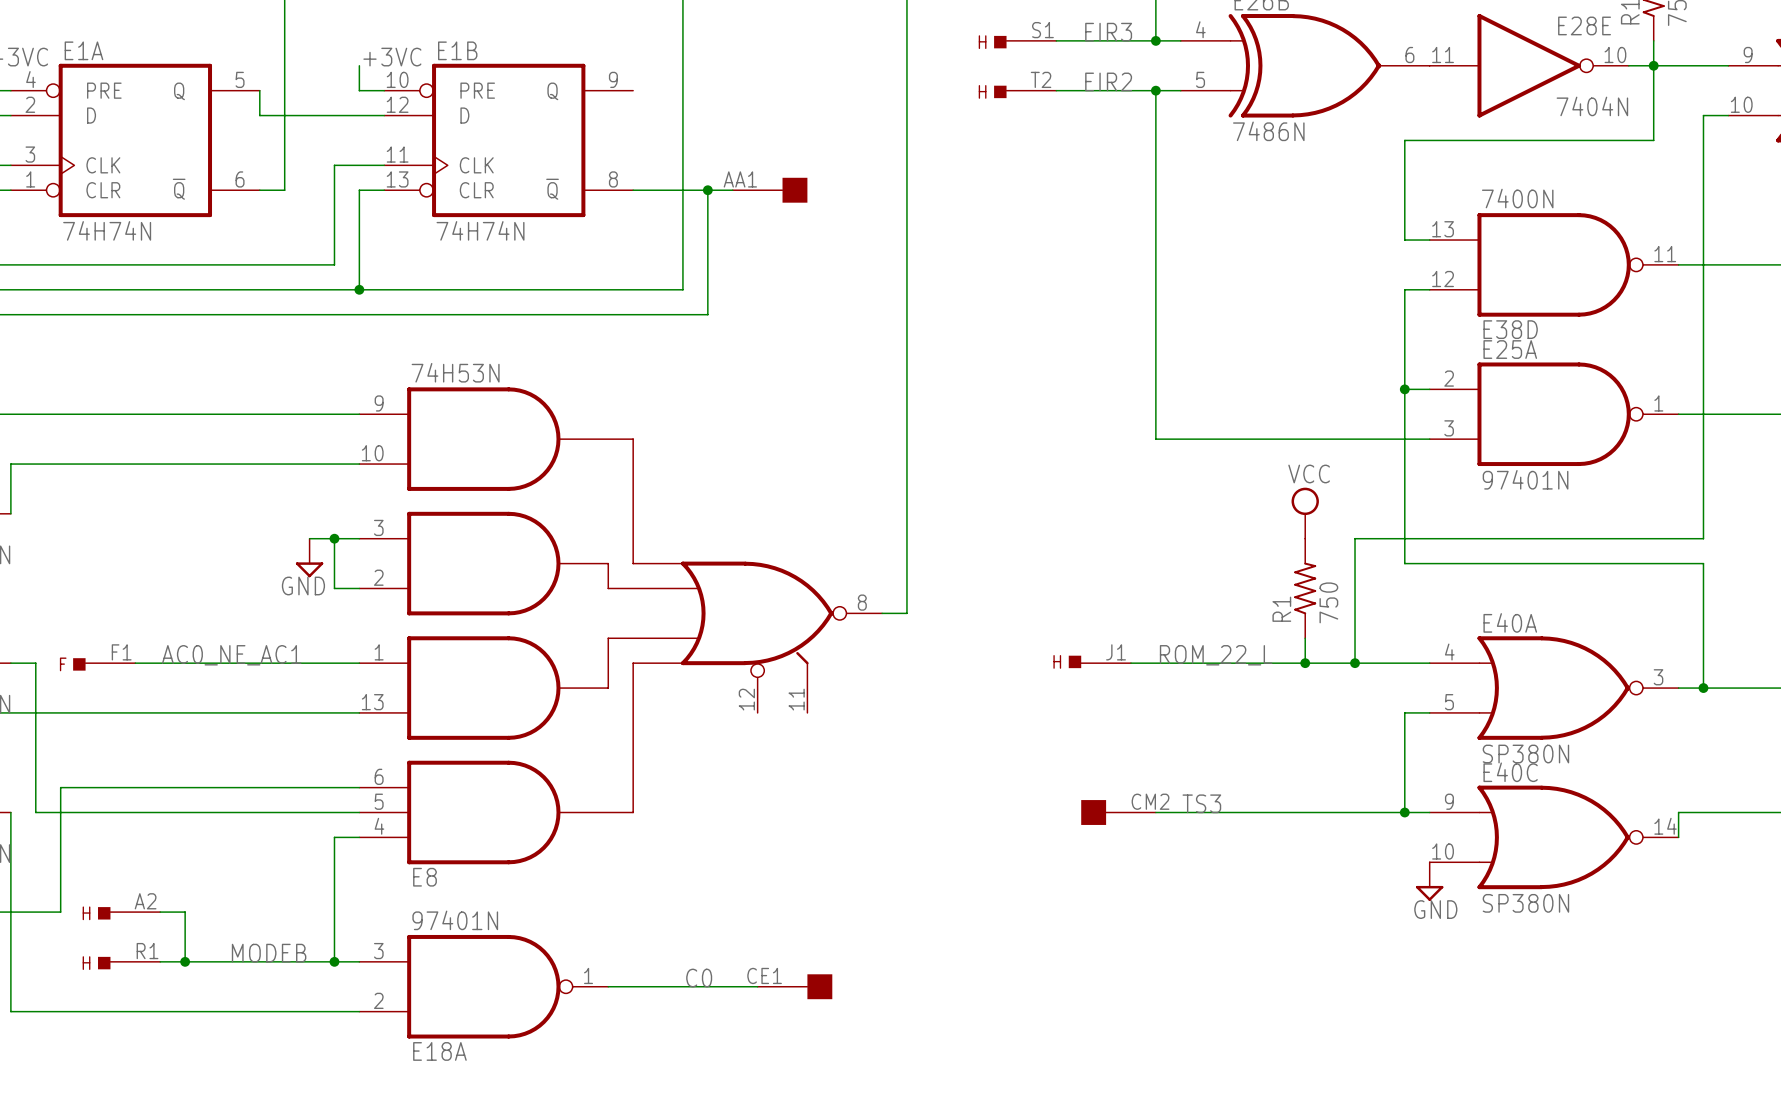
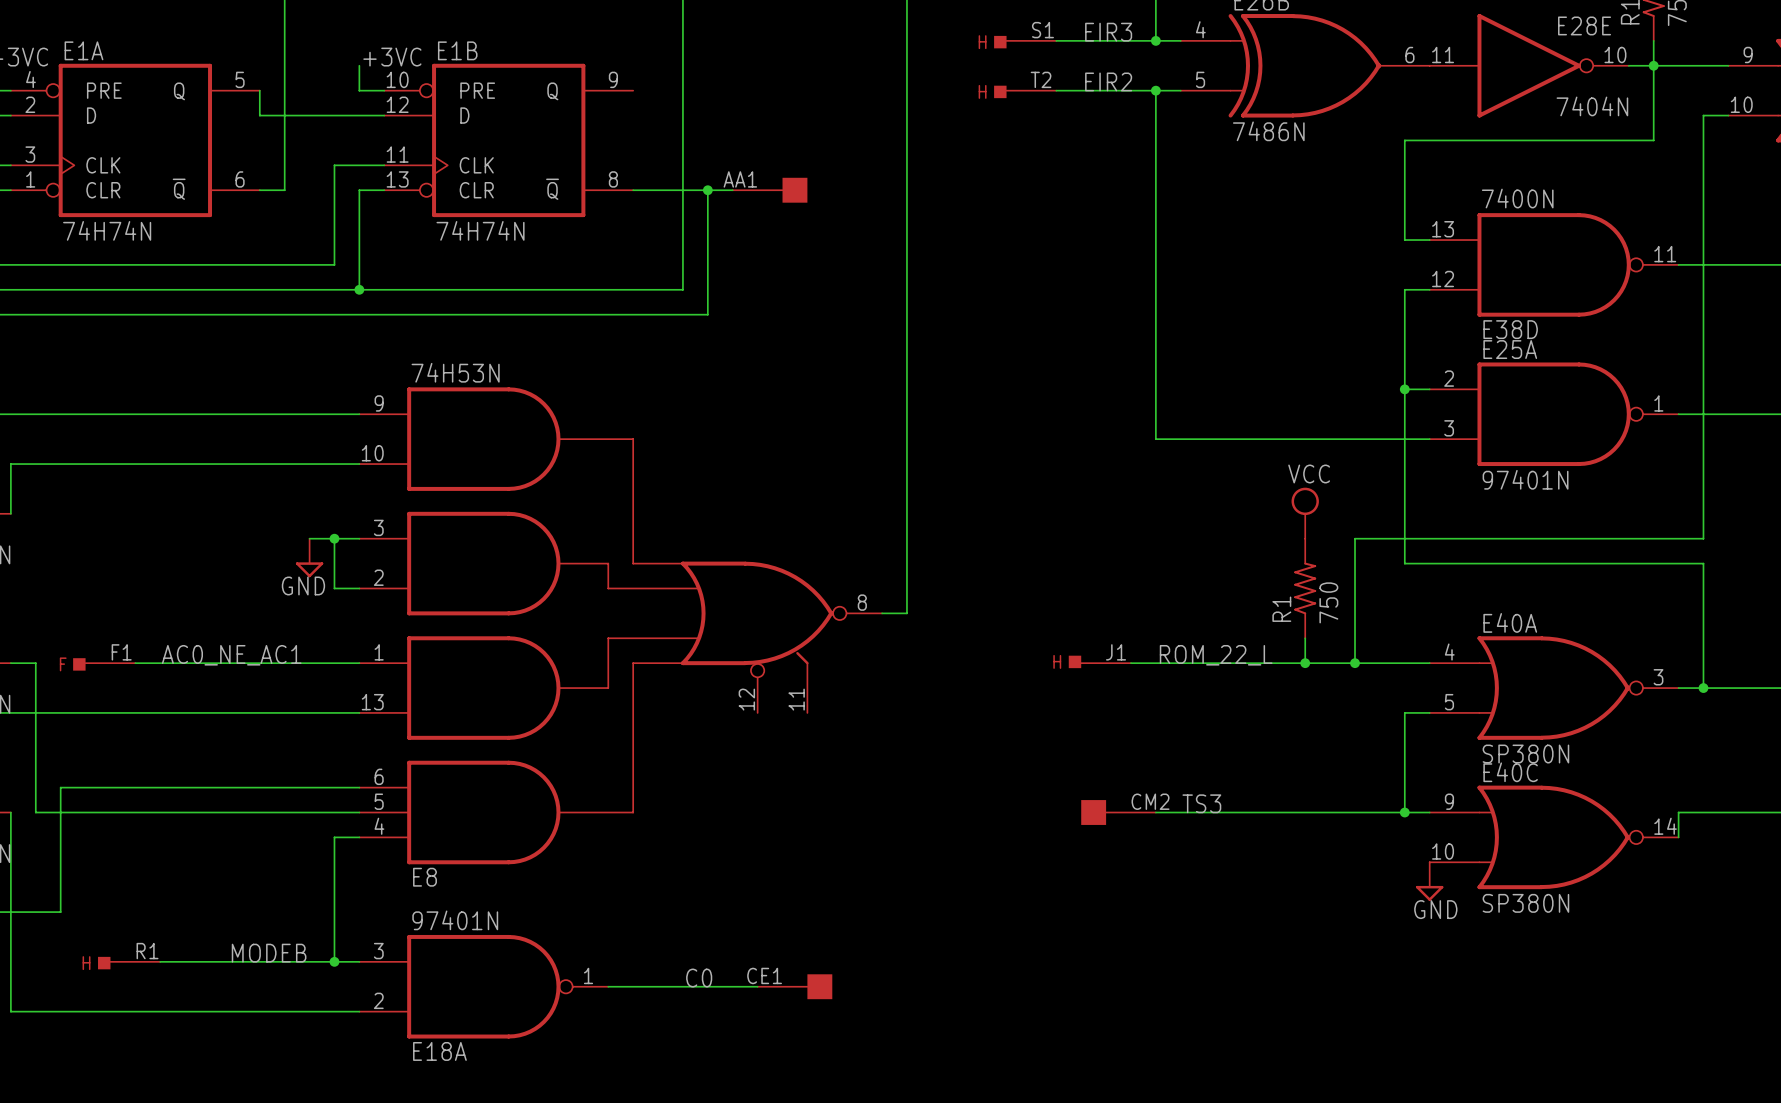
wire: (160, 912) (185, 912) (185, 961) -> none
H: (129, 913) -> none
junction: (185, 961) -> none

